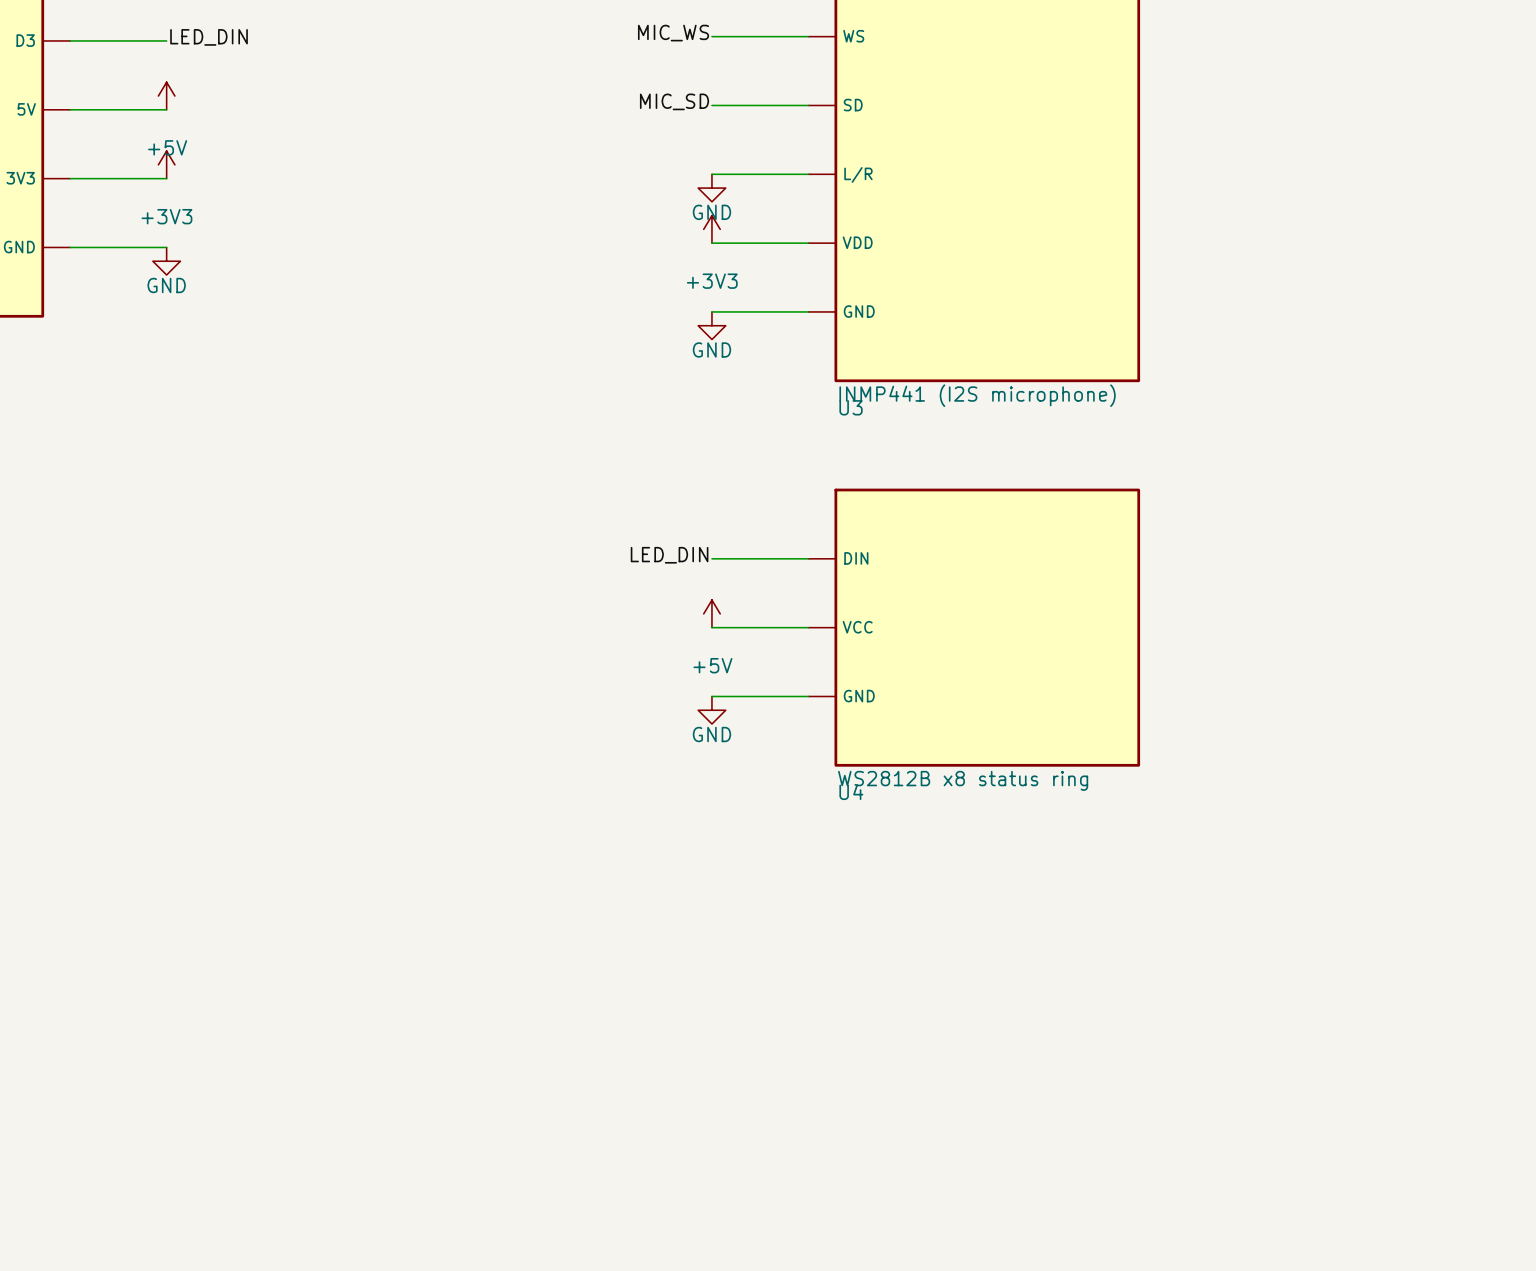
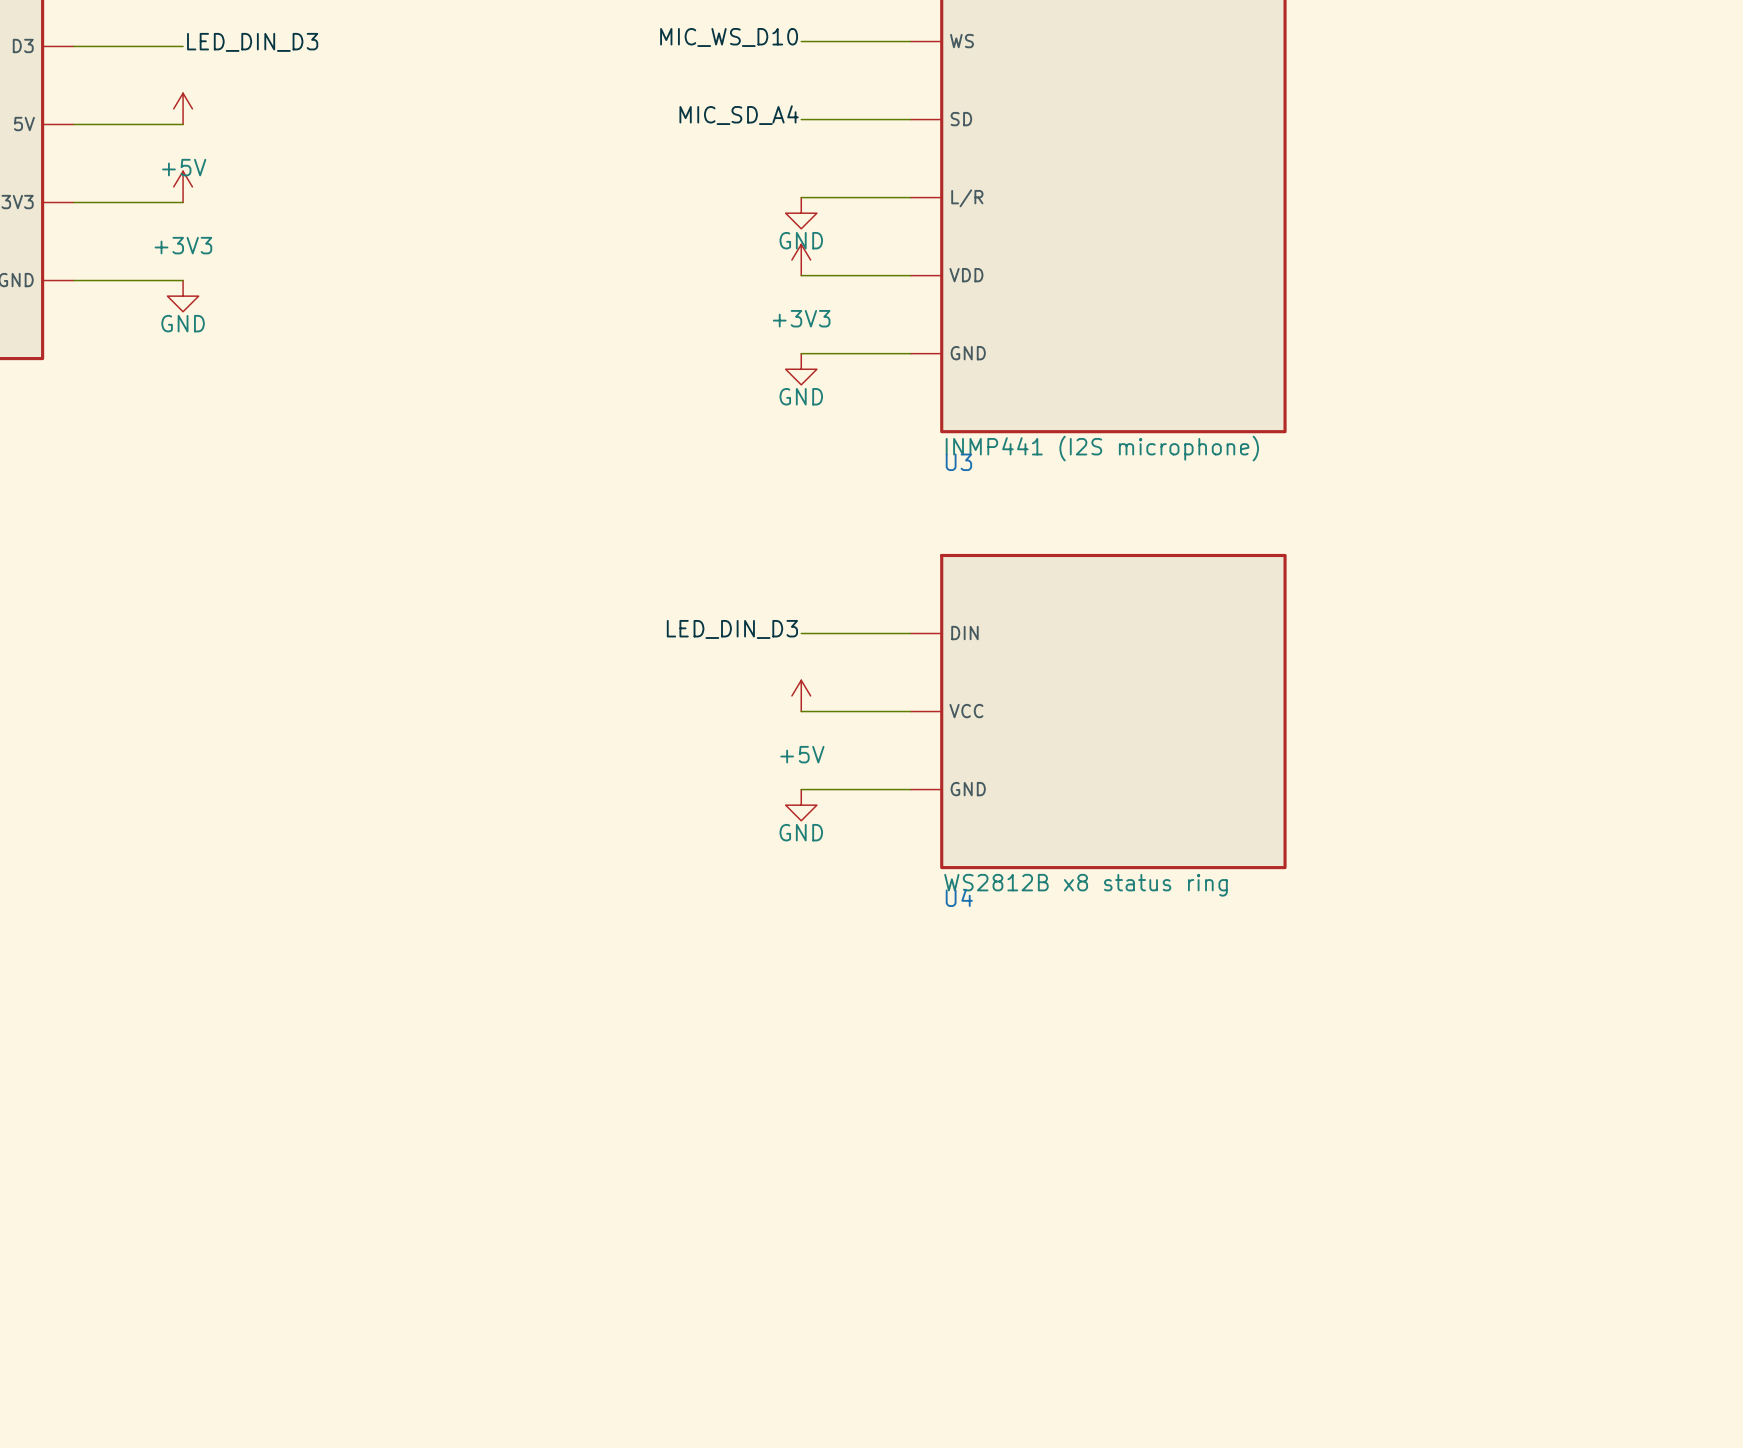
label: MIC_WS (673, 33) -> MIC_WS_D10 (729, 37)
label: LED_DIN (209, 37) -> LED_DIN_D3 (252, 42)
label: MIC_SD (674, 101) -> MIC_SD_A4 (739, 115)
label: LED_DIN (669, 555) -> LED_DIN_D3 (732, 629)

